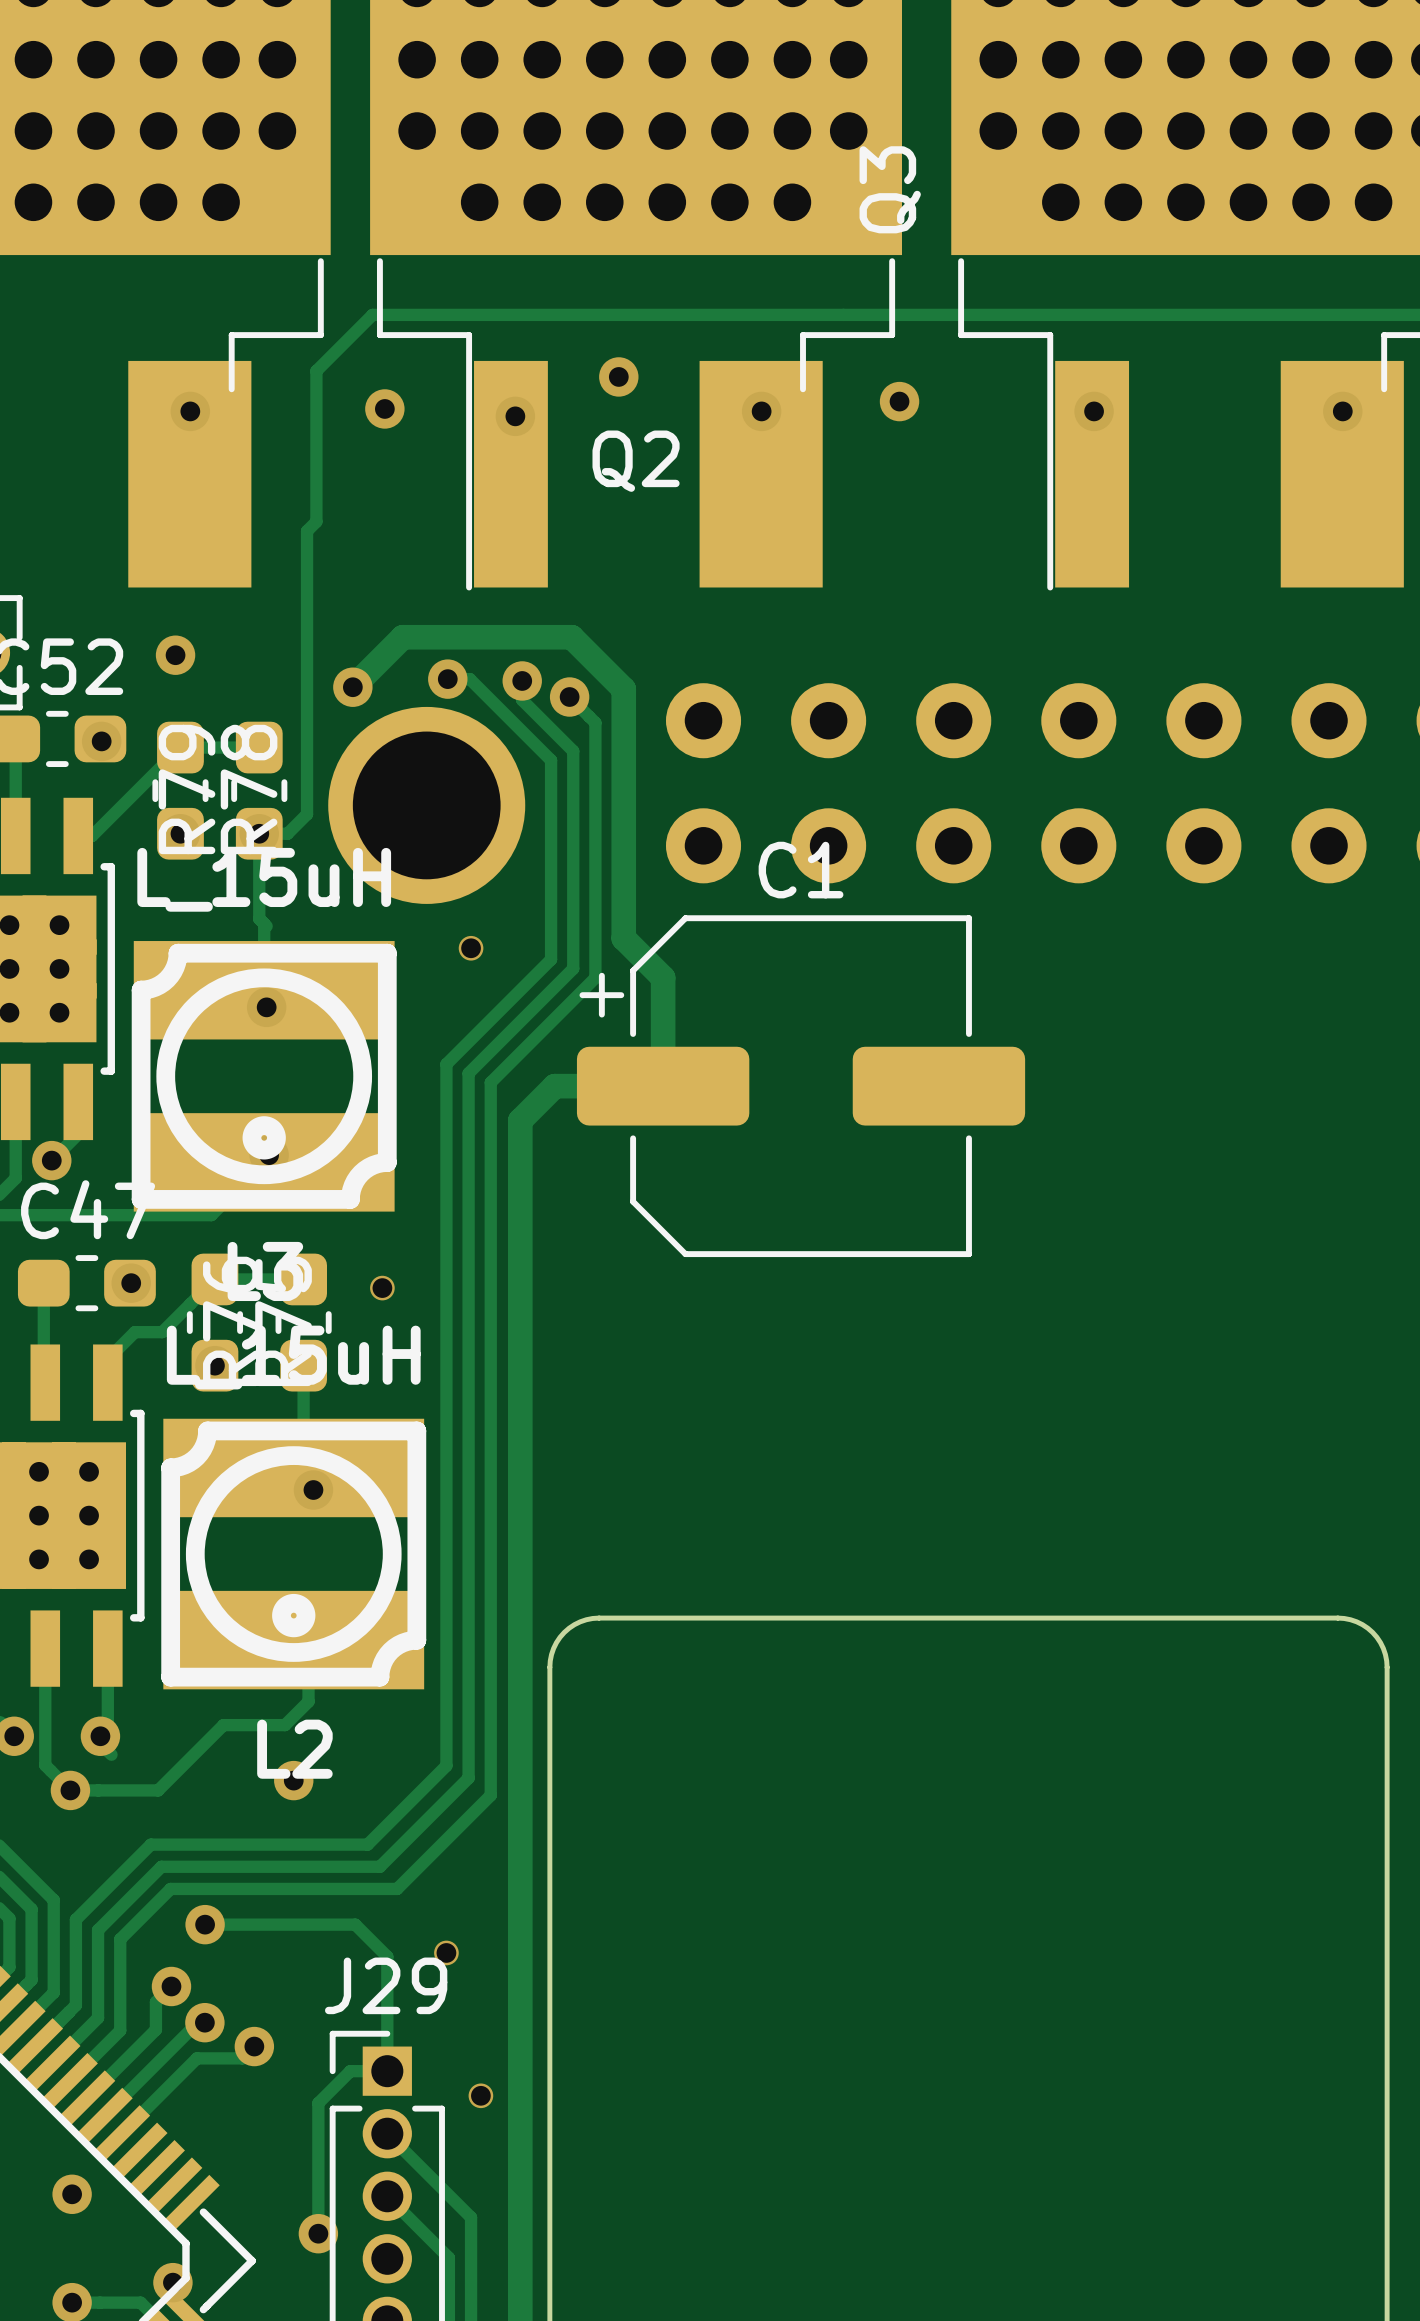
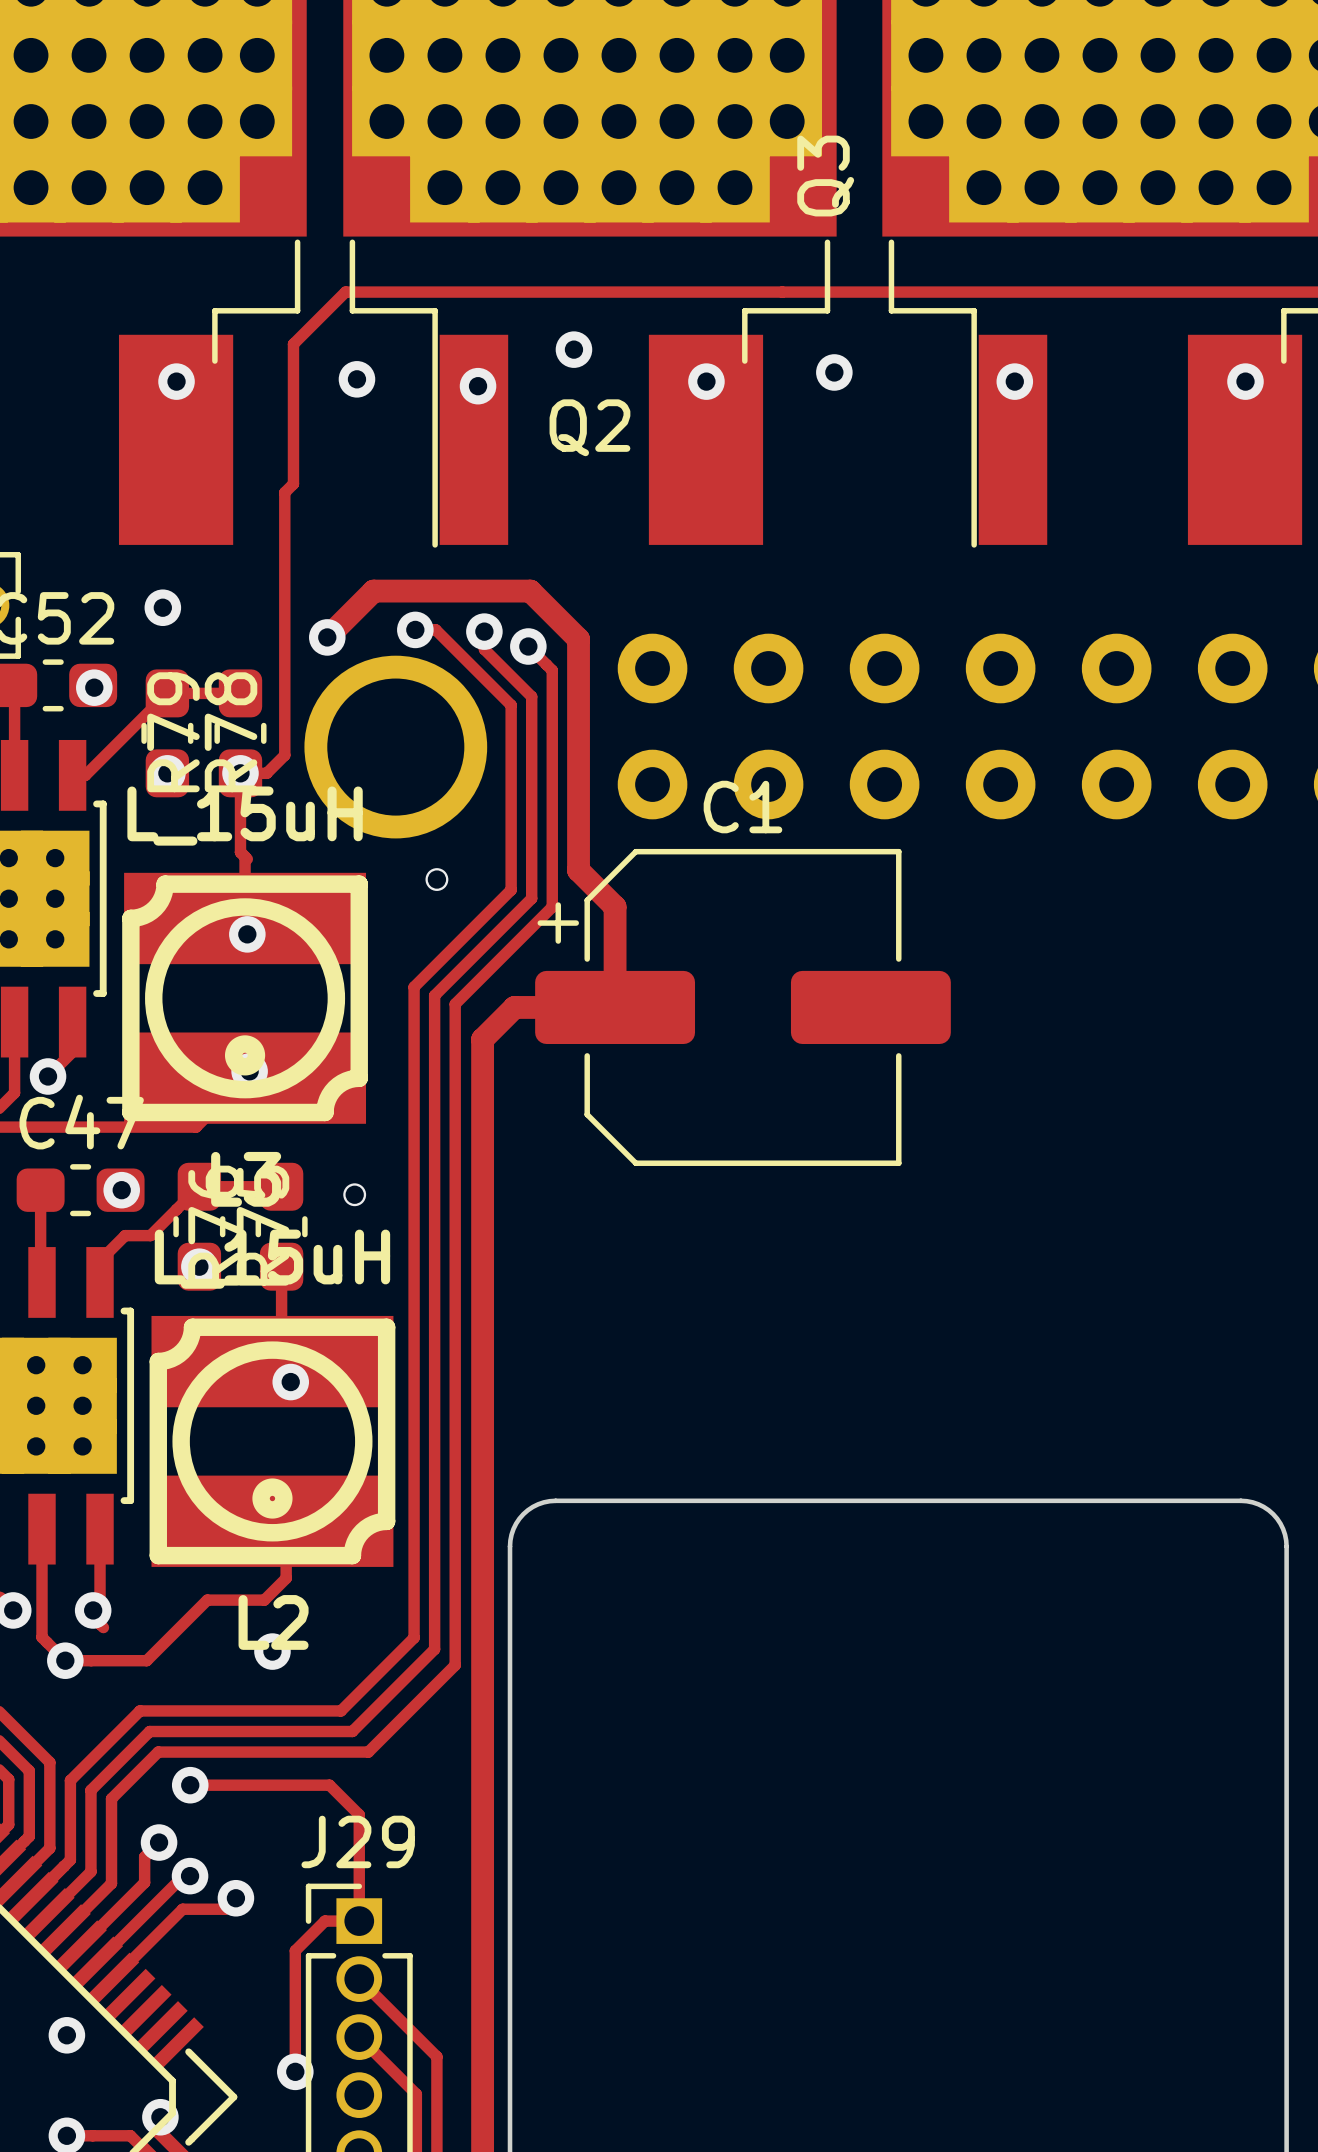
via: (446, 1952) -> none
via: (480, 2095) -> none

